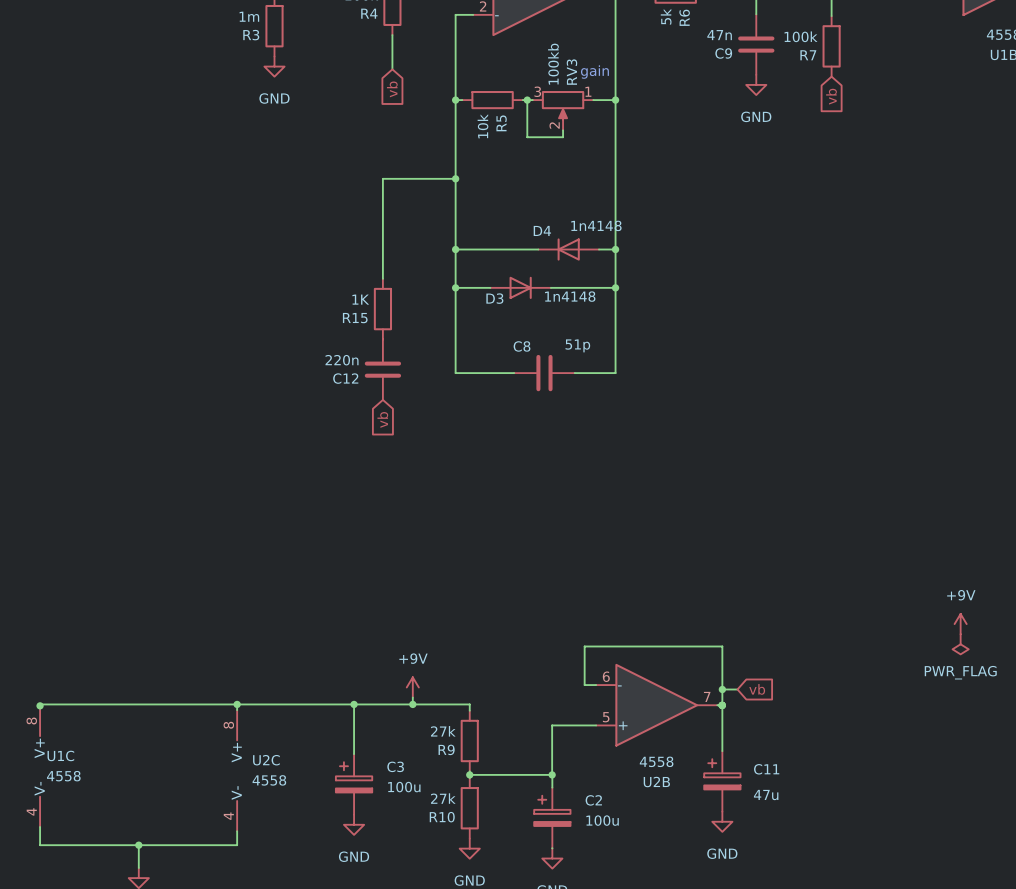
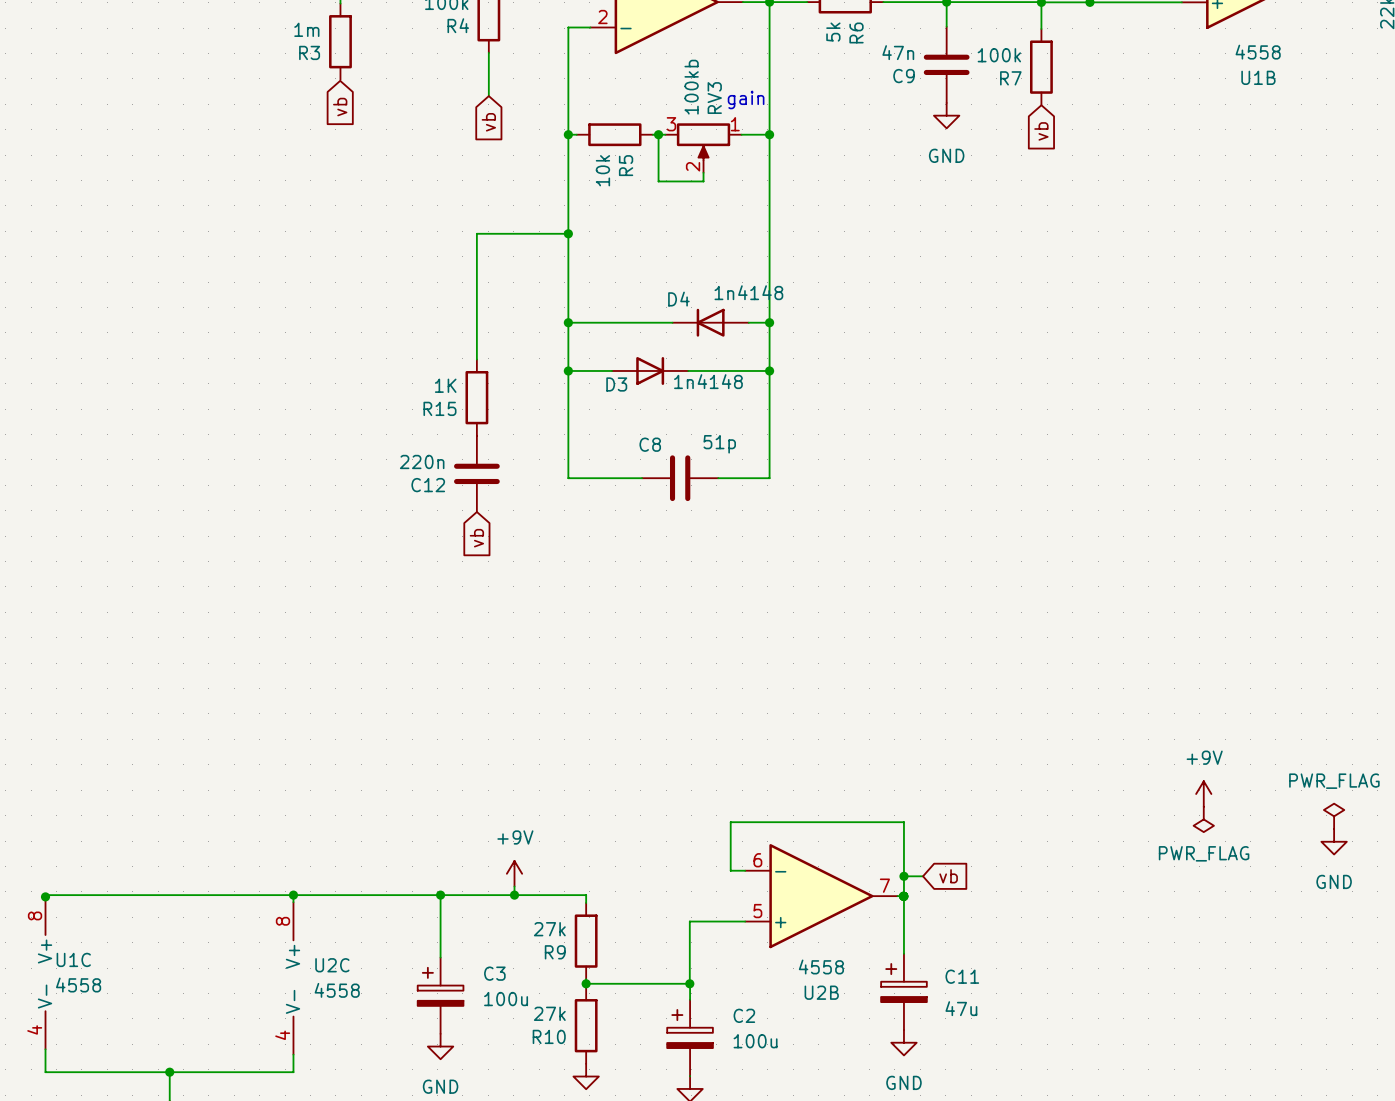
power symbol: GND (274, 66) -> none
global label: none -> vb (340, 107)

